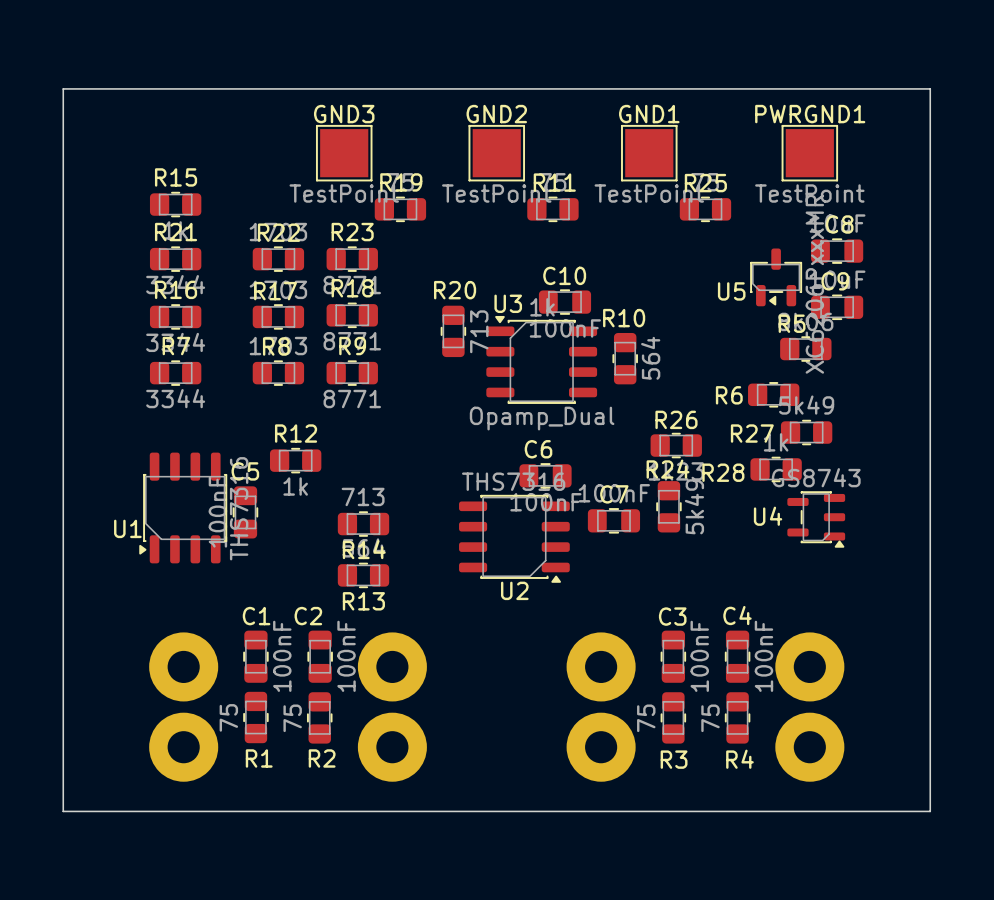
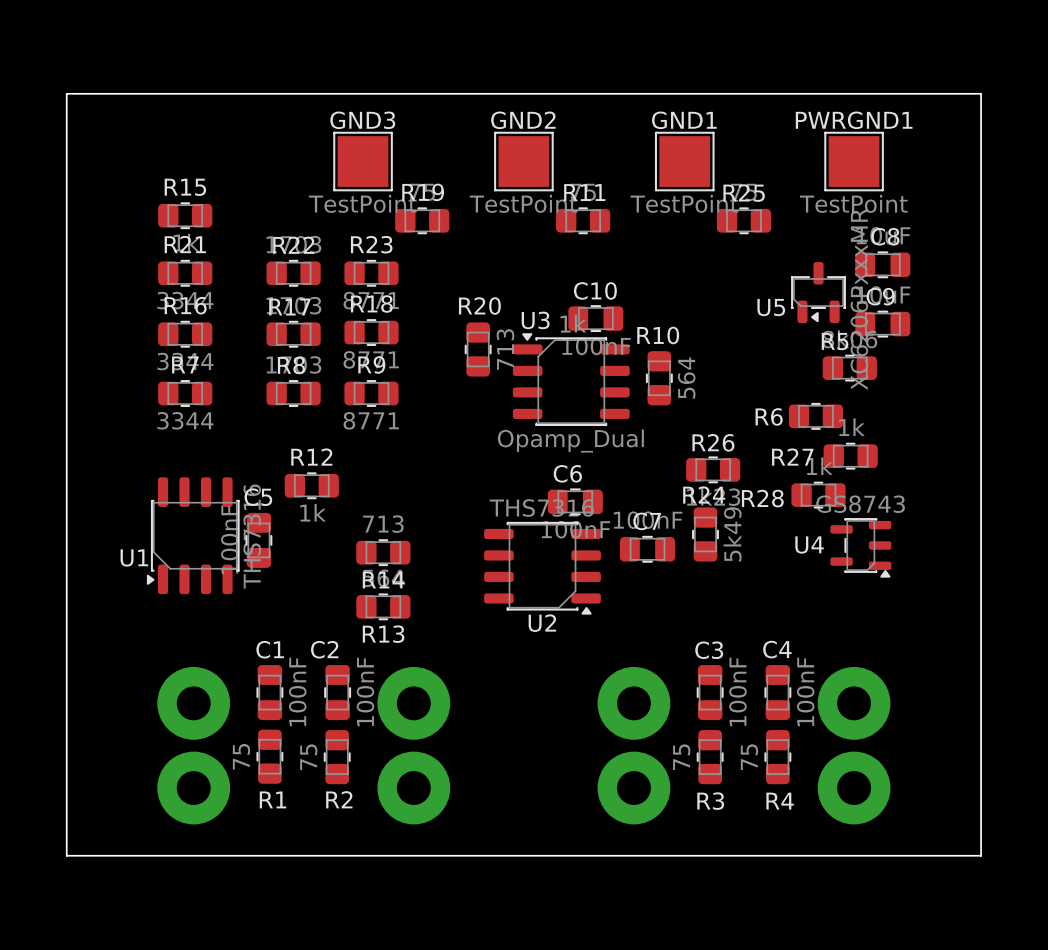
R27 value: 5k49 (806, 405) -> 1k (851, 427)

